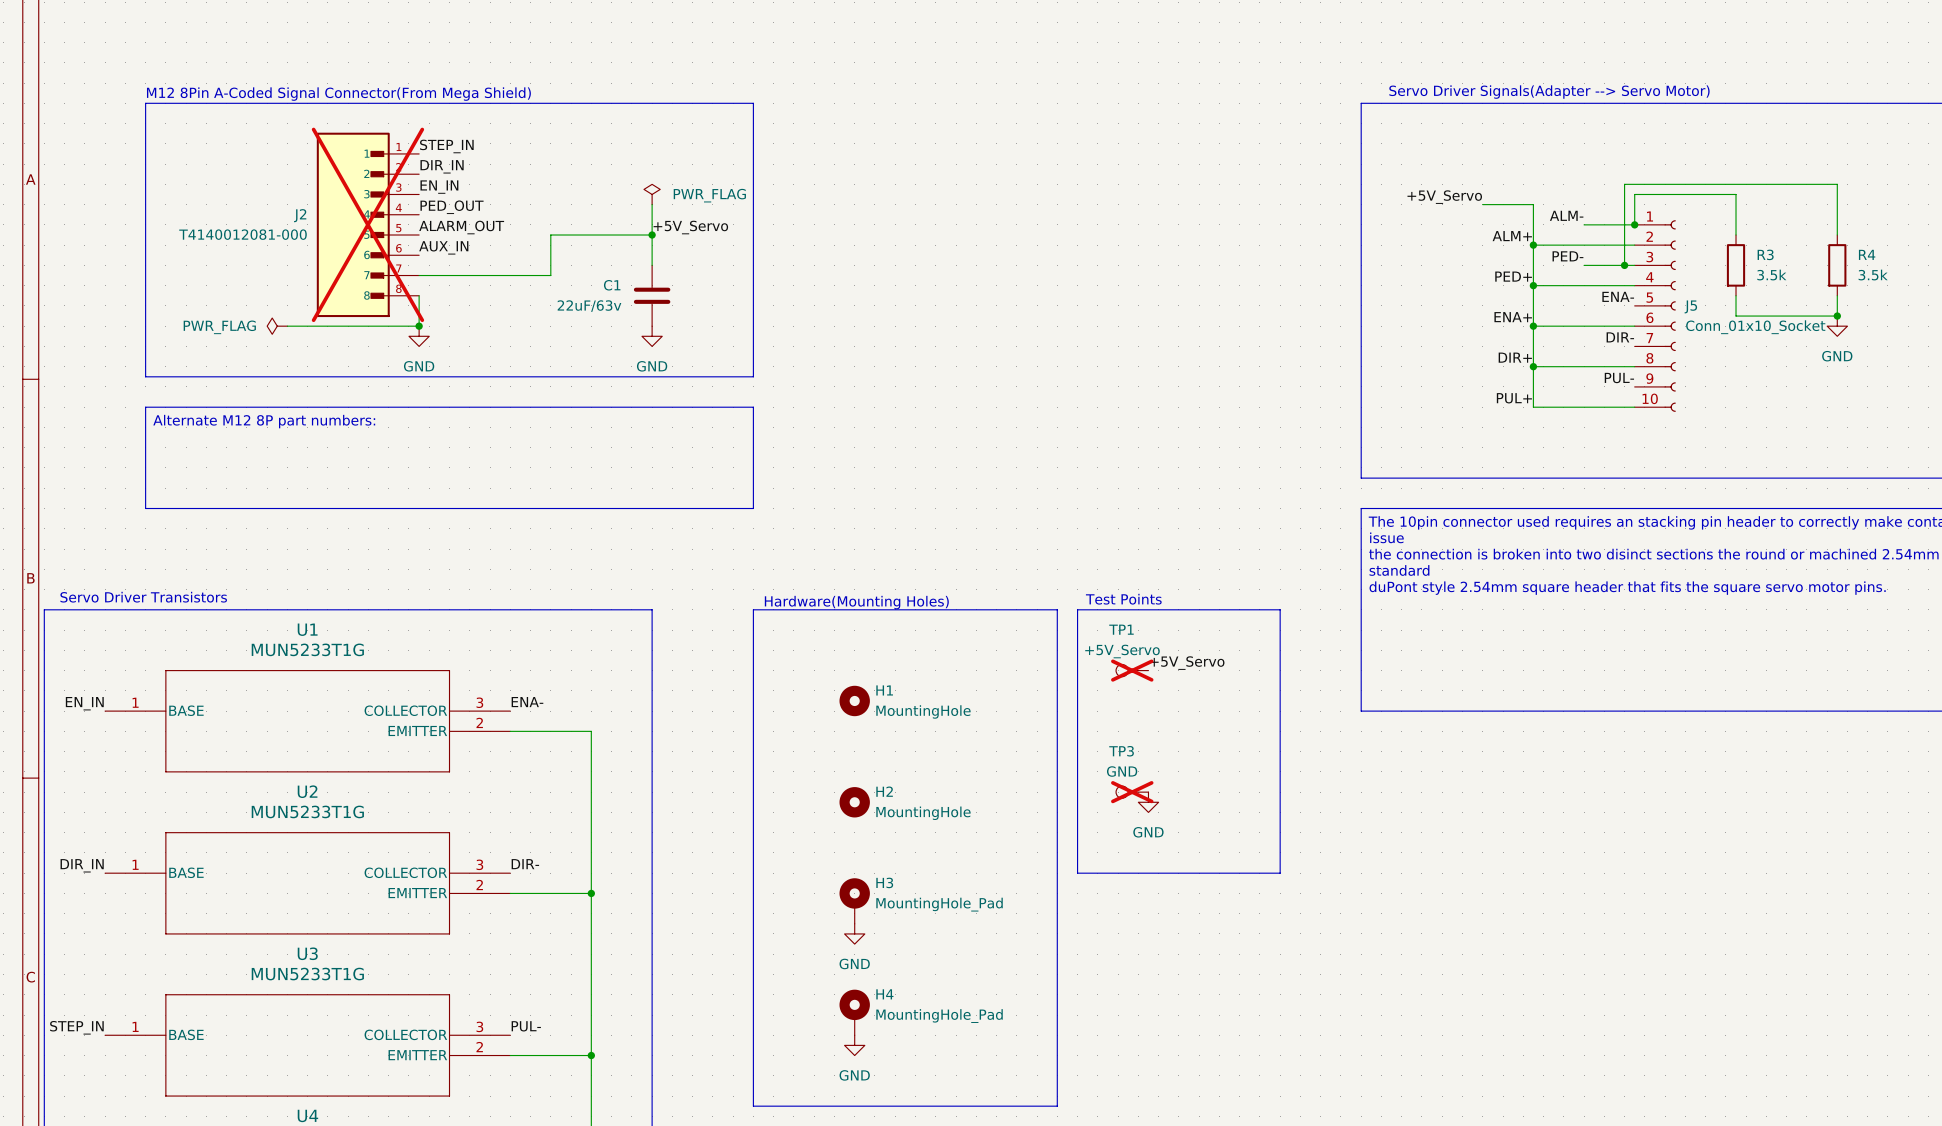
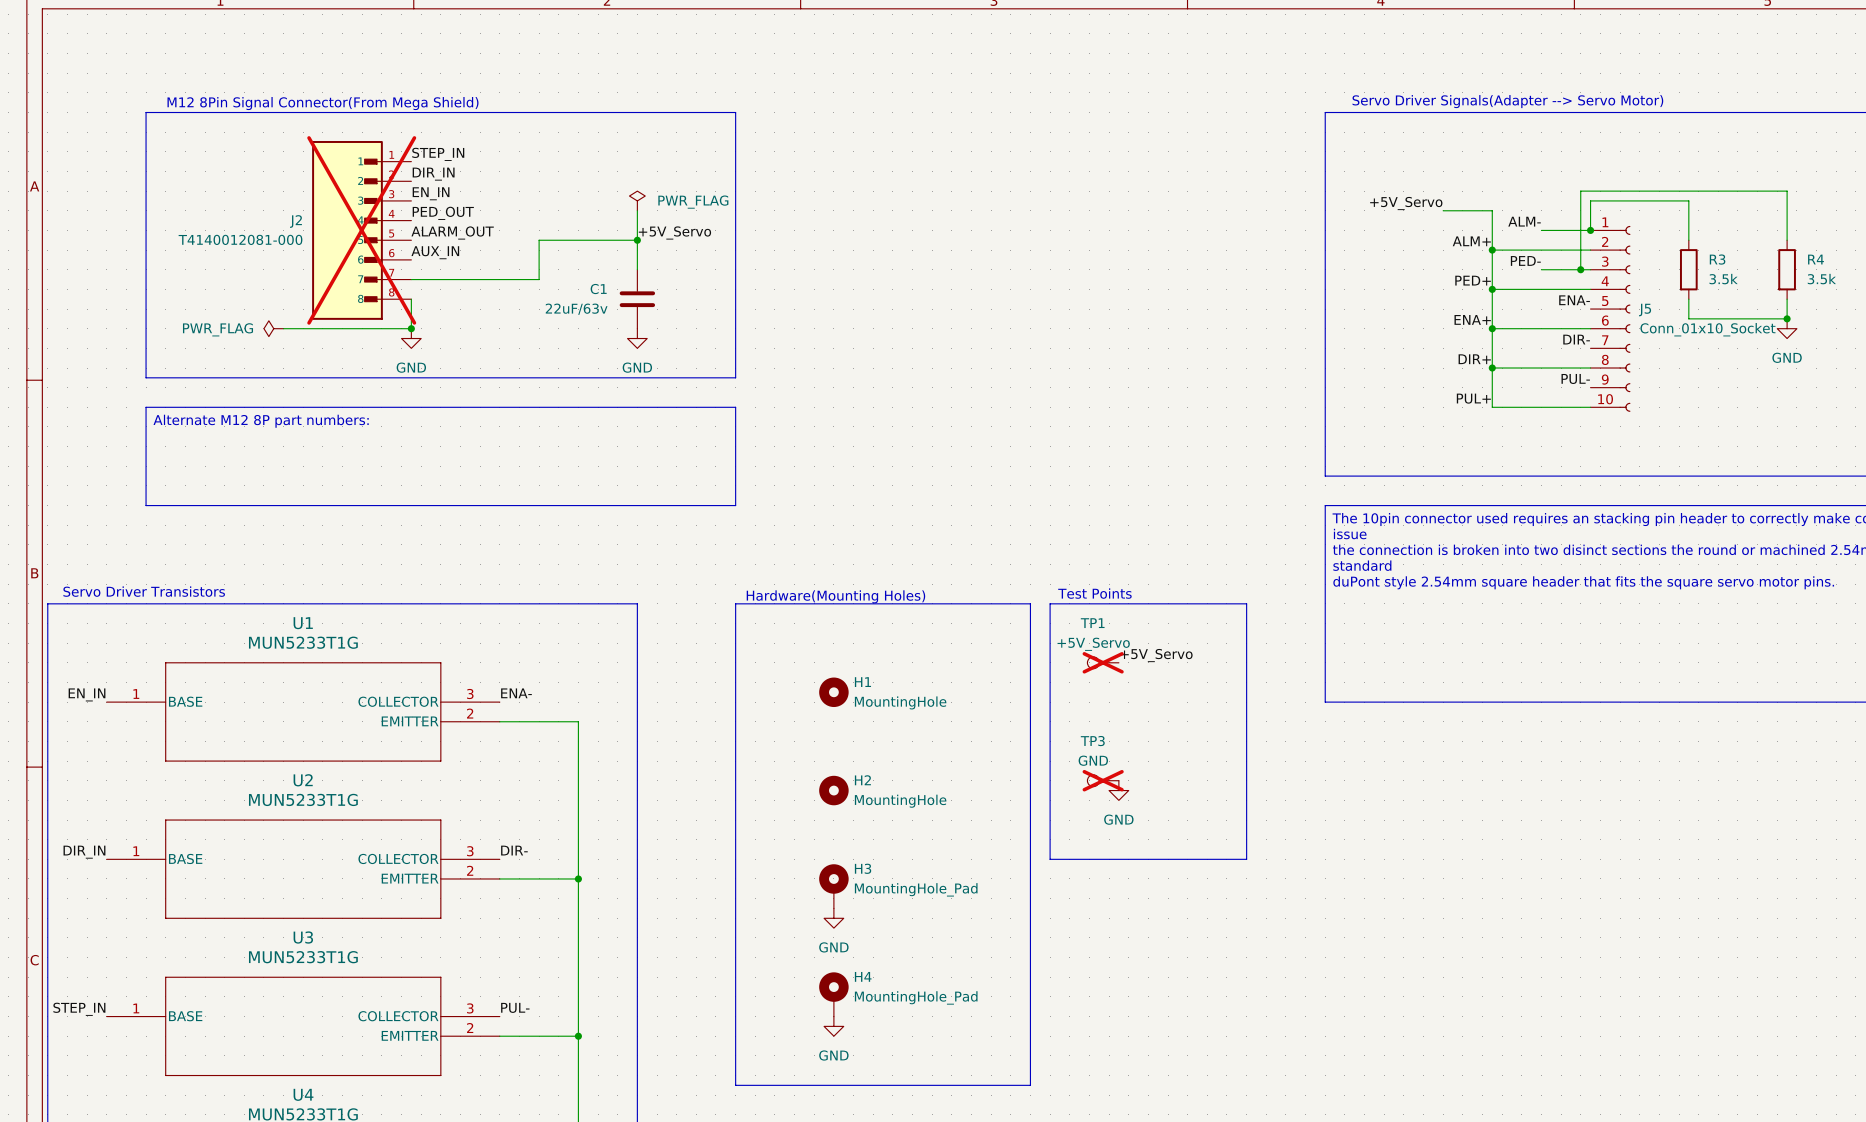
text: M12 8Pin A-Coded Signal Connector(From Mega Shield) (338, 94) -> M12 8Pin Signal Connector(From Mega Shield) (323, 103)

